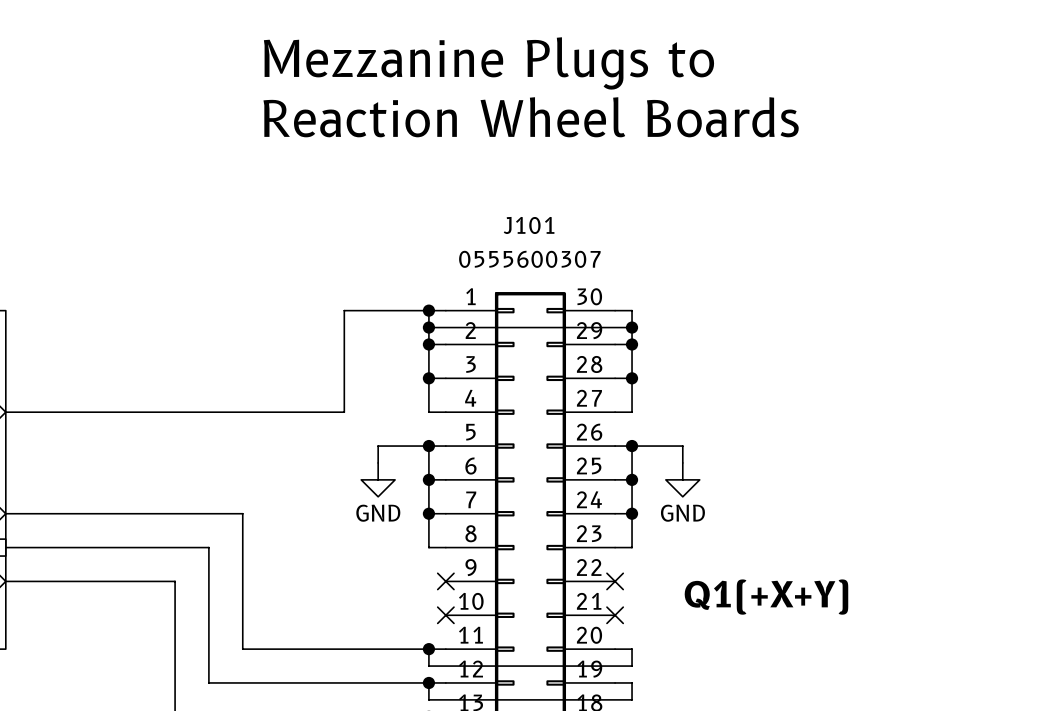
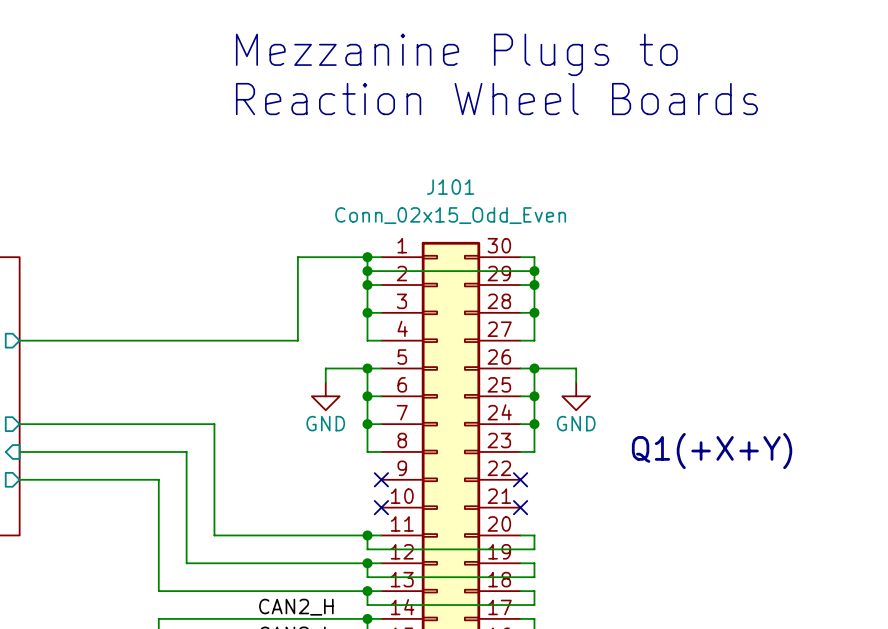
J101 value: 0555600307 (529, 259) -> Conn_02x15_Odd_Even (450, 215)
text position: Q1(+X+Y) (766, 597) -> Q1(+X+Y) (712, 451)

